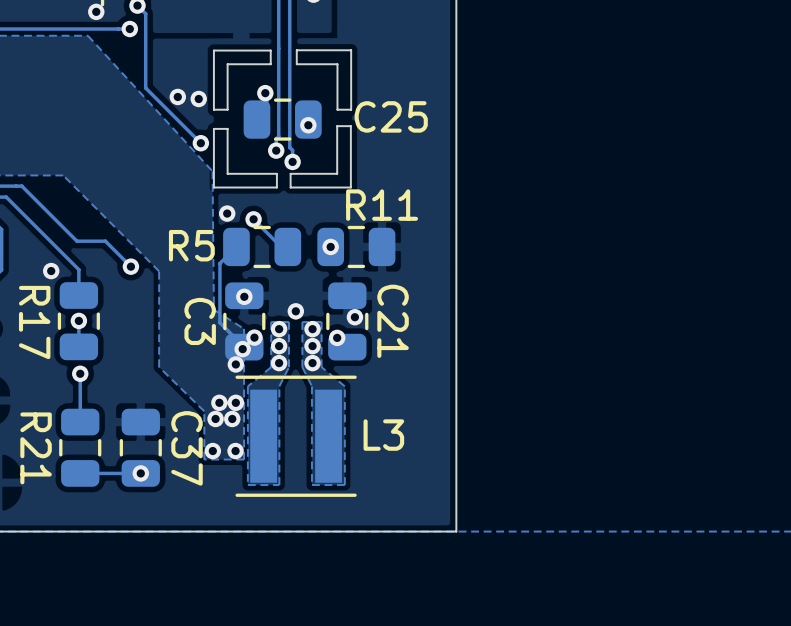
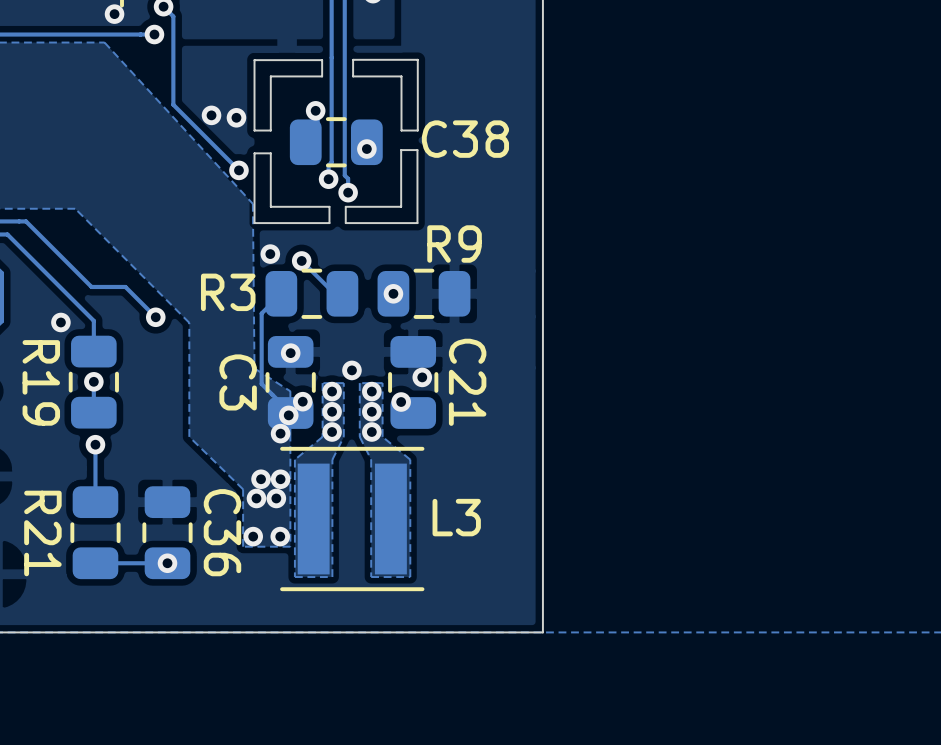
C25 name: C25 (391, 116) -> C38 (465, 139)
R11 name: R11 (382, 205) -> R9 (454, 244)
R5 name: R5 (191, 245) -> R3 (228, 292)
R17 name: R17 (34, 322) -> R19 (41, 382)
C37 name: C37 (187, 448) -> C36 (222, 532)

